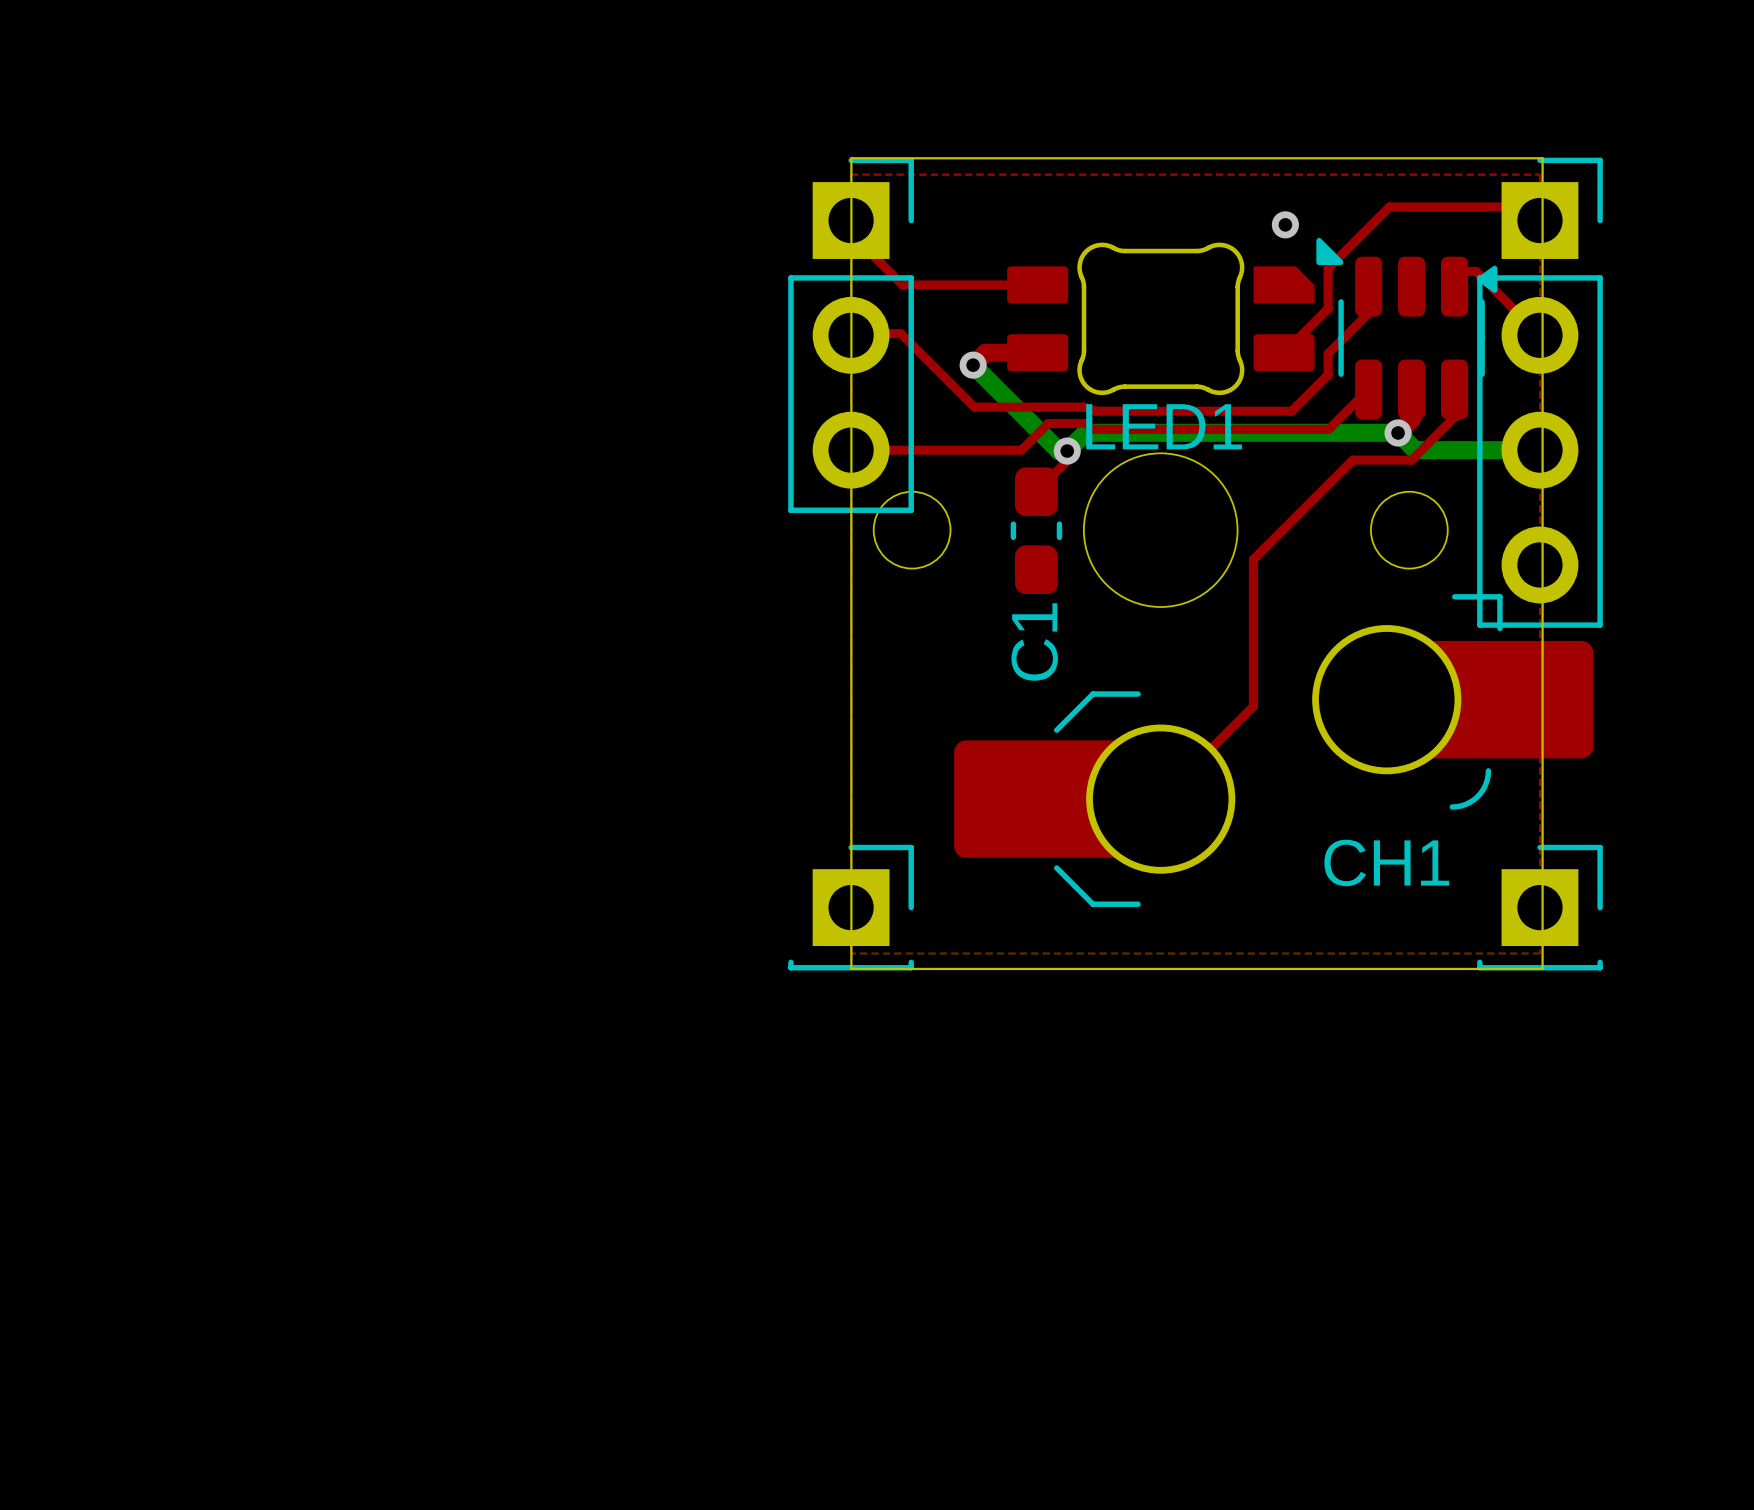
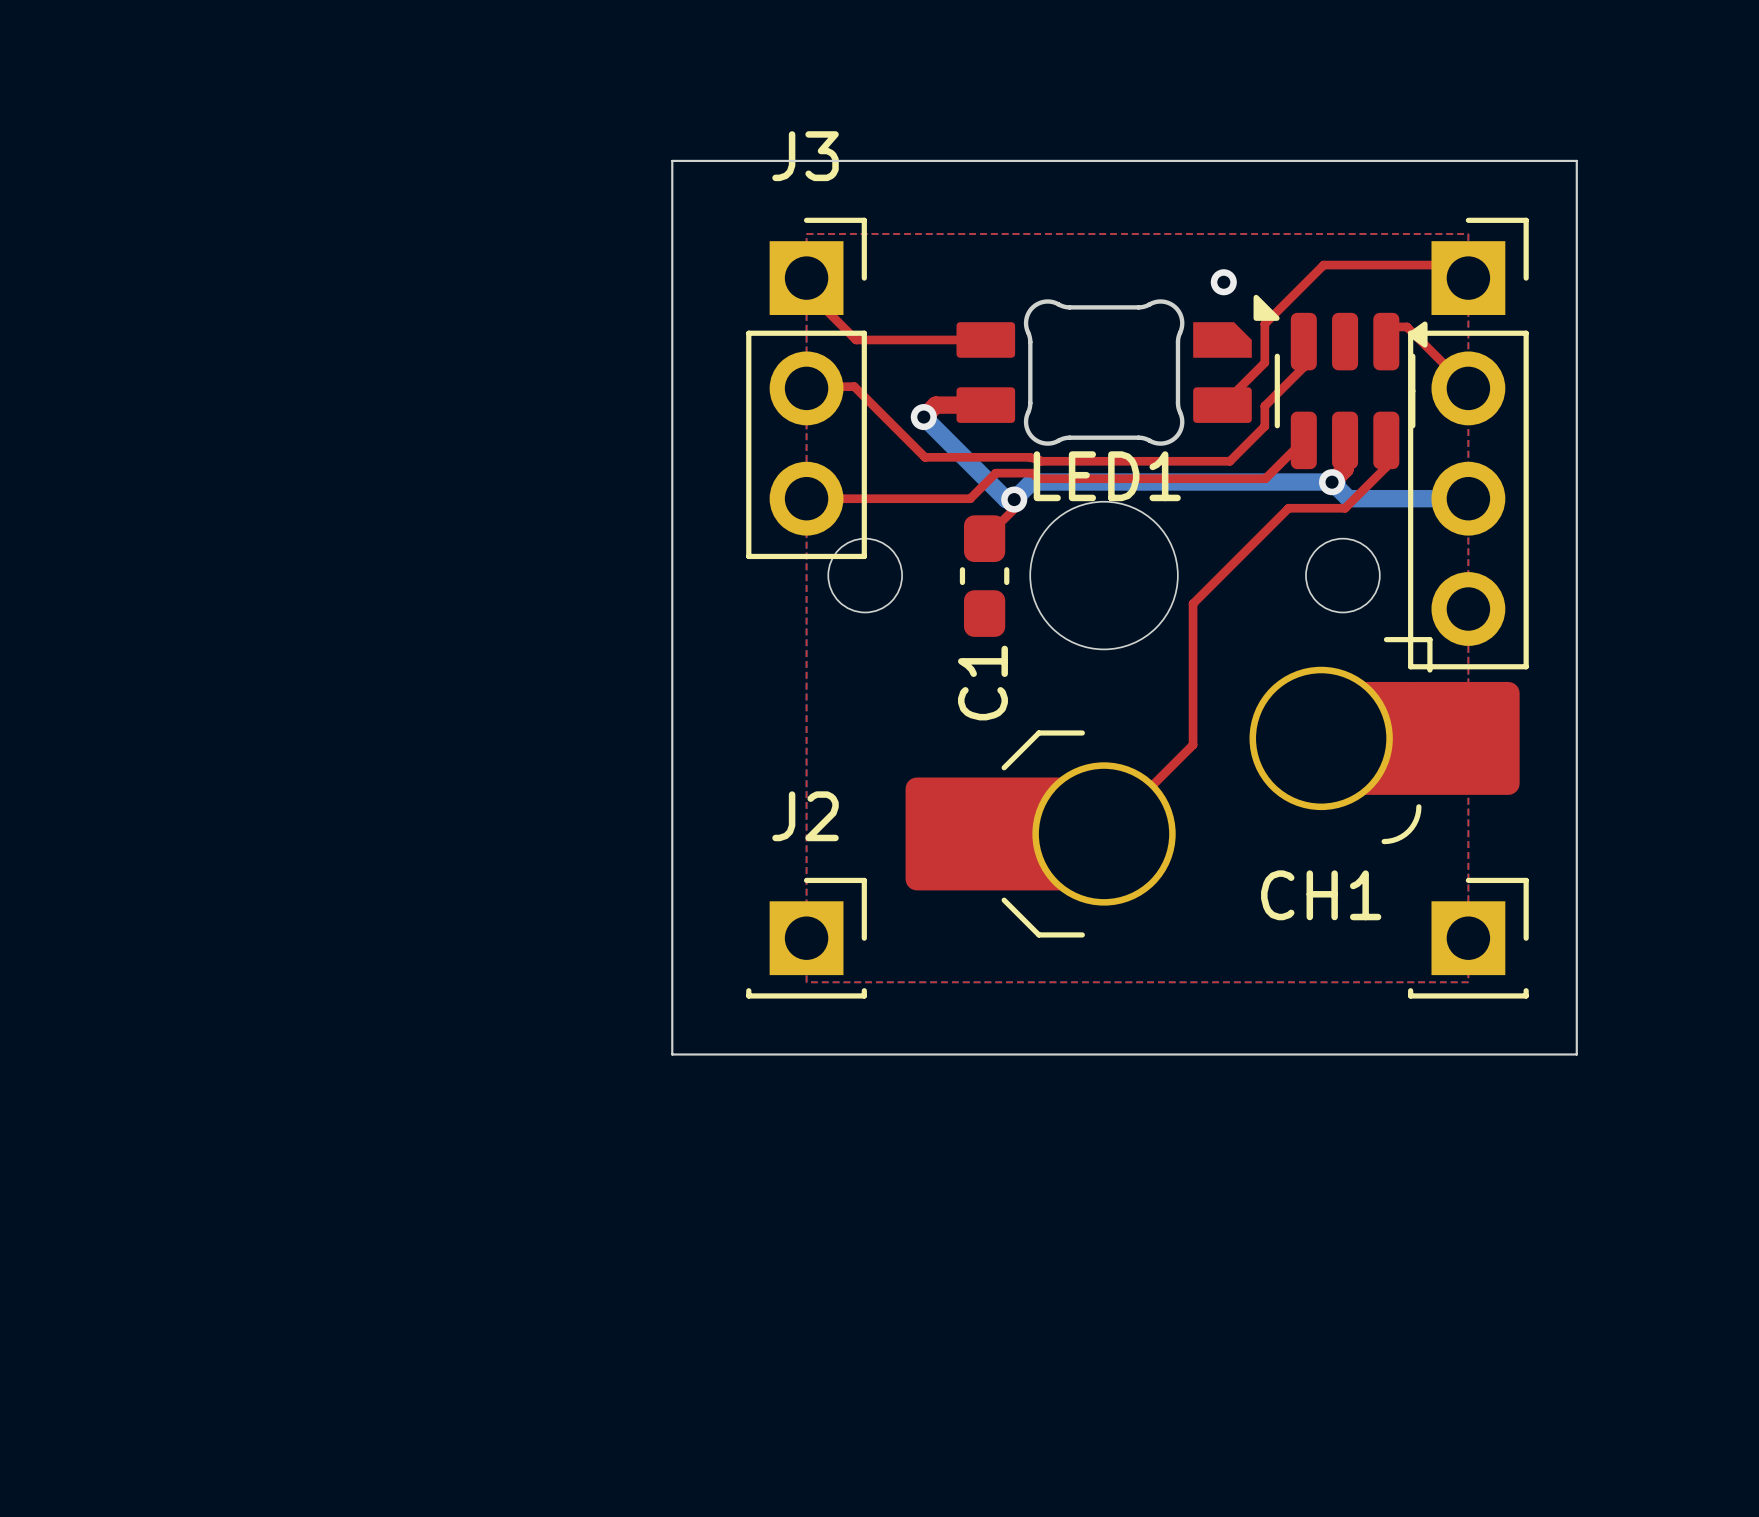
J3 name: none -> J3 (805, 156)
board edge: (851, 158) (1542, 158) (1542, 968) (851, 968) (851, 158) -> (672, 160) (672, 1054) (1576, 1054) (1576, 160) (672, 160)
J2 name: none -> J2 (805, 816)

